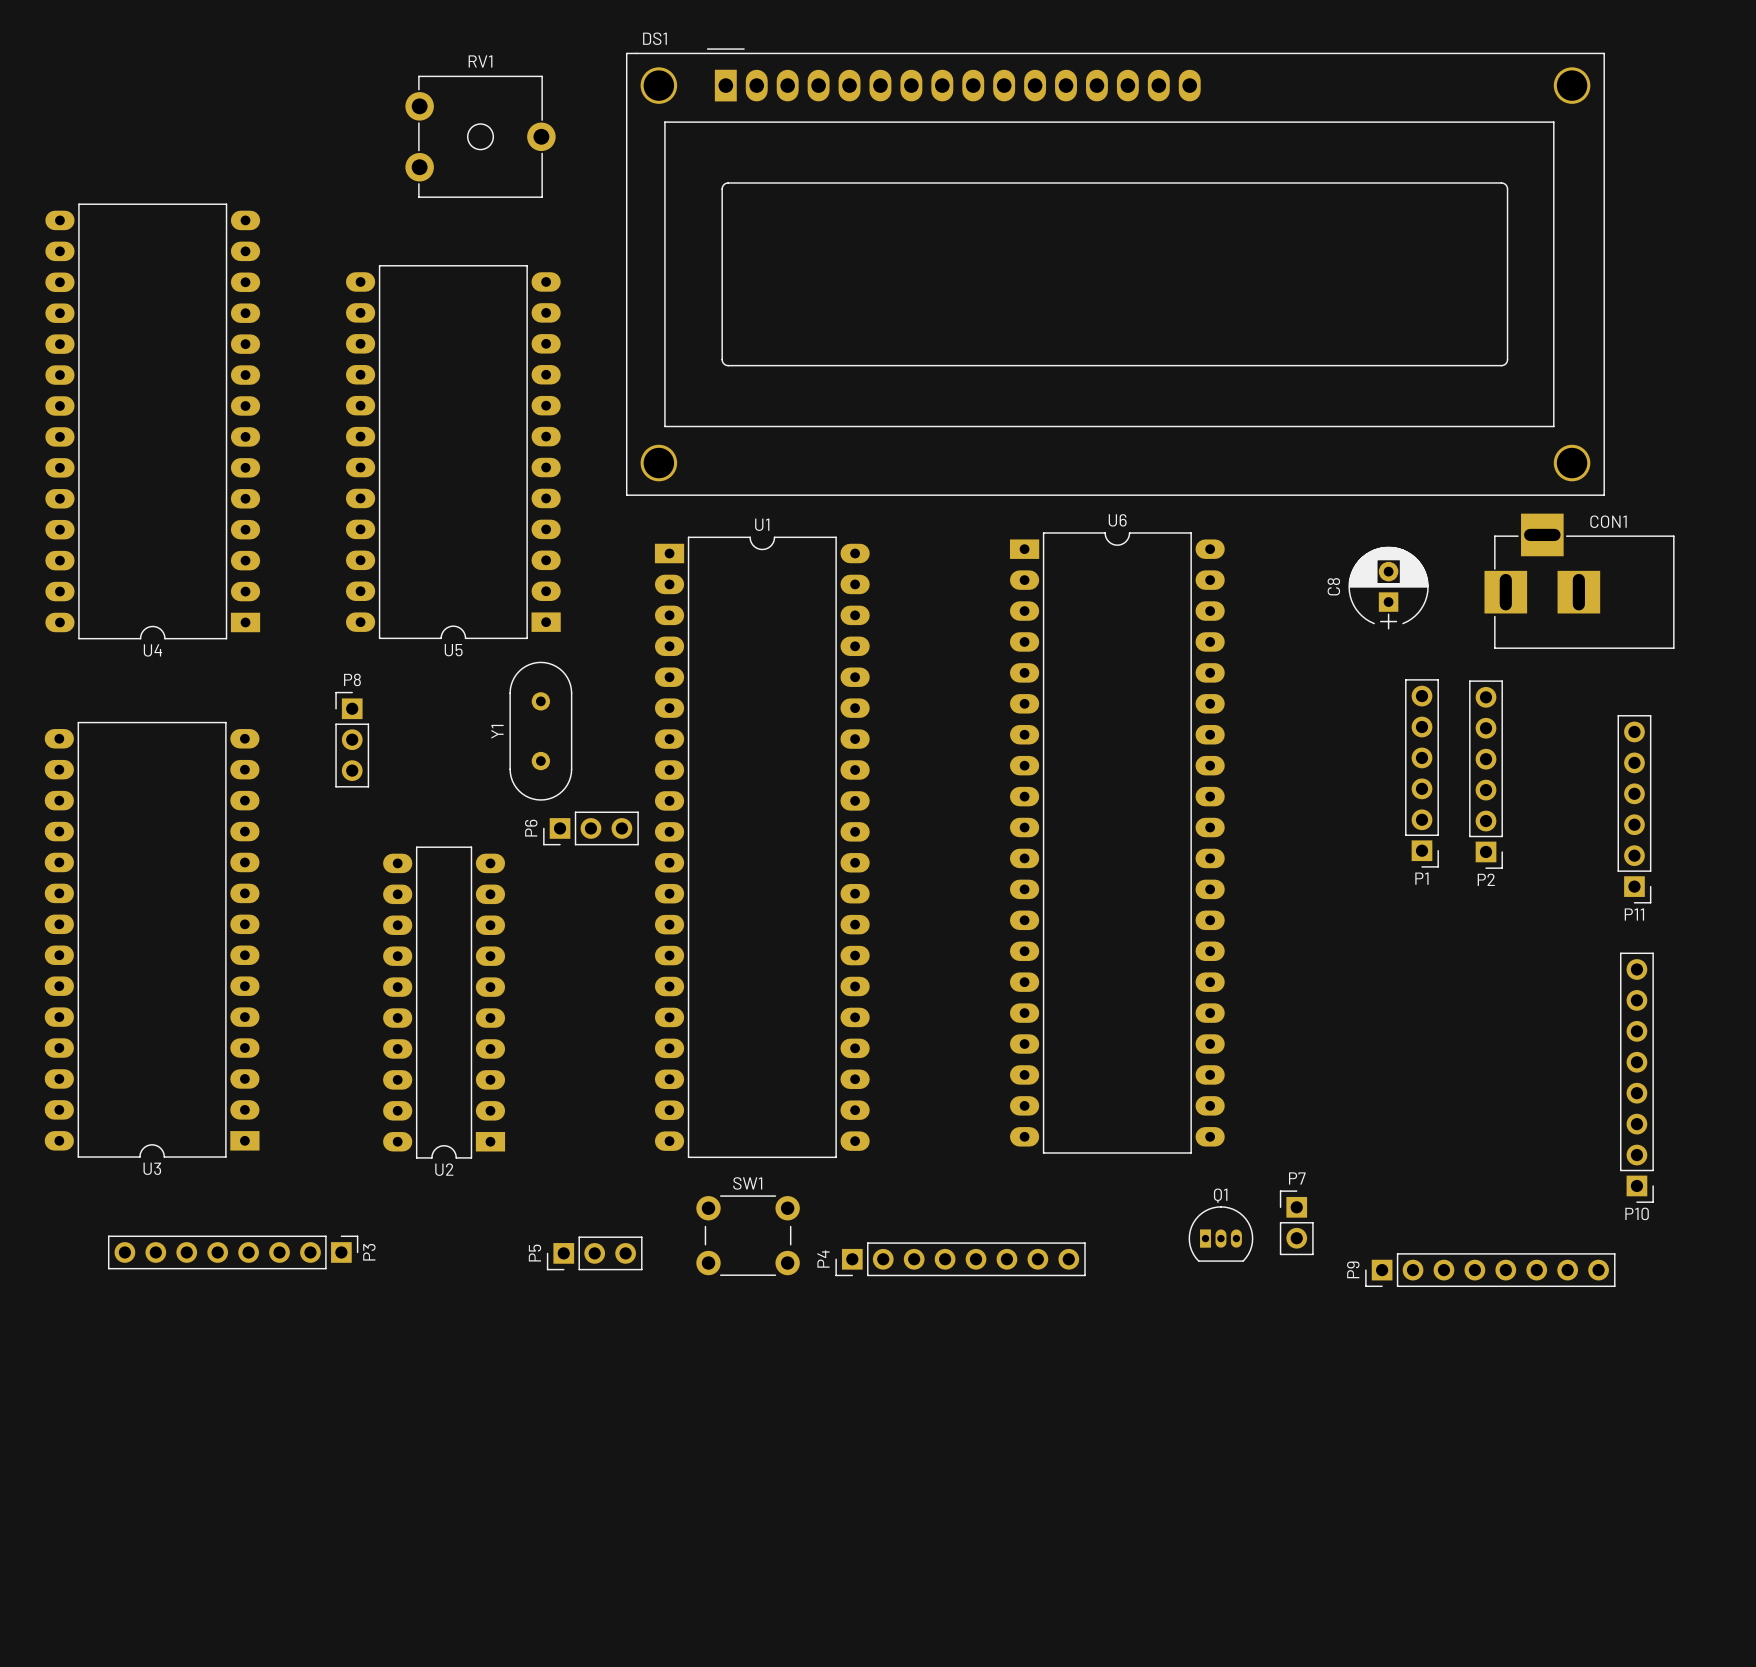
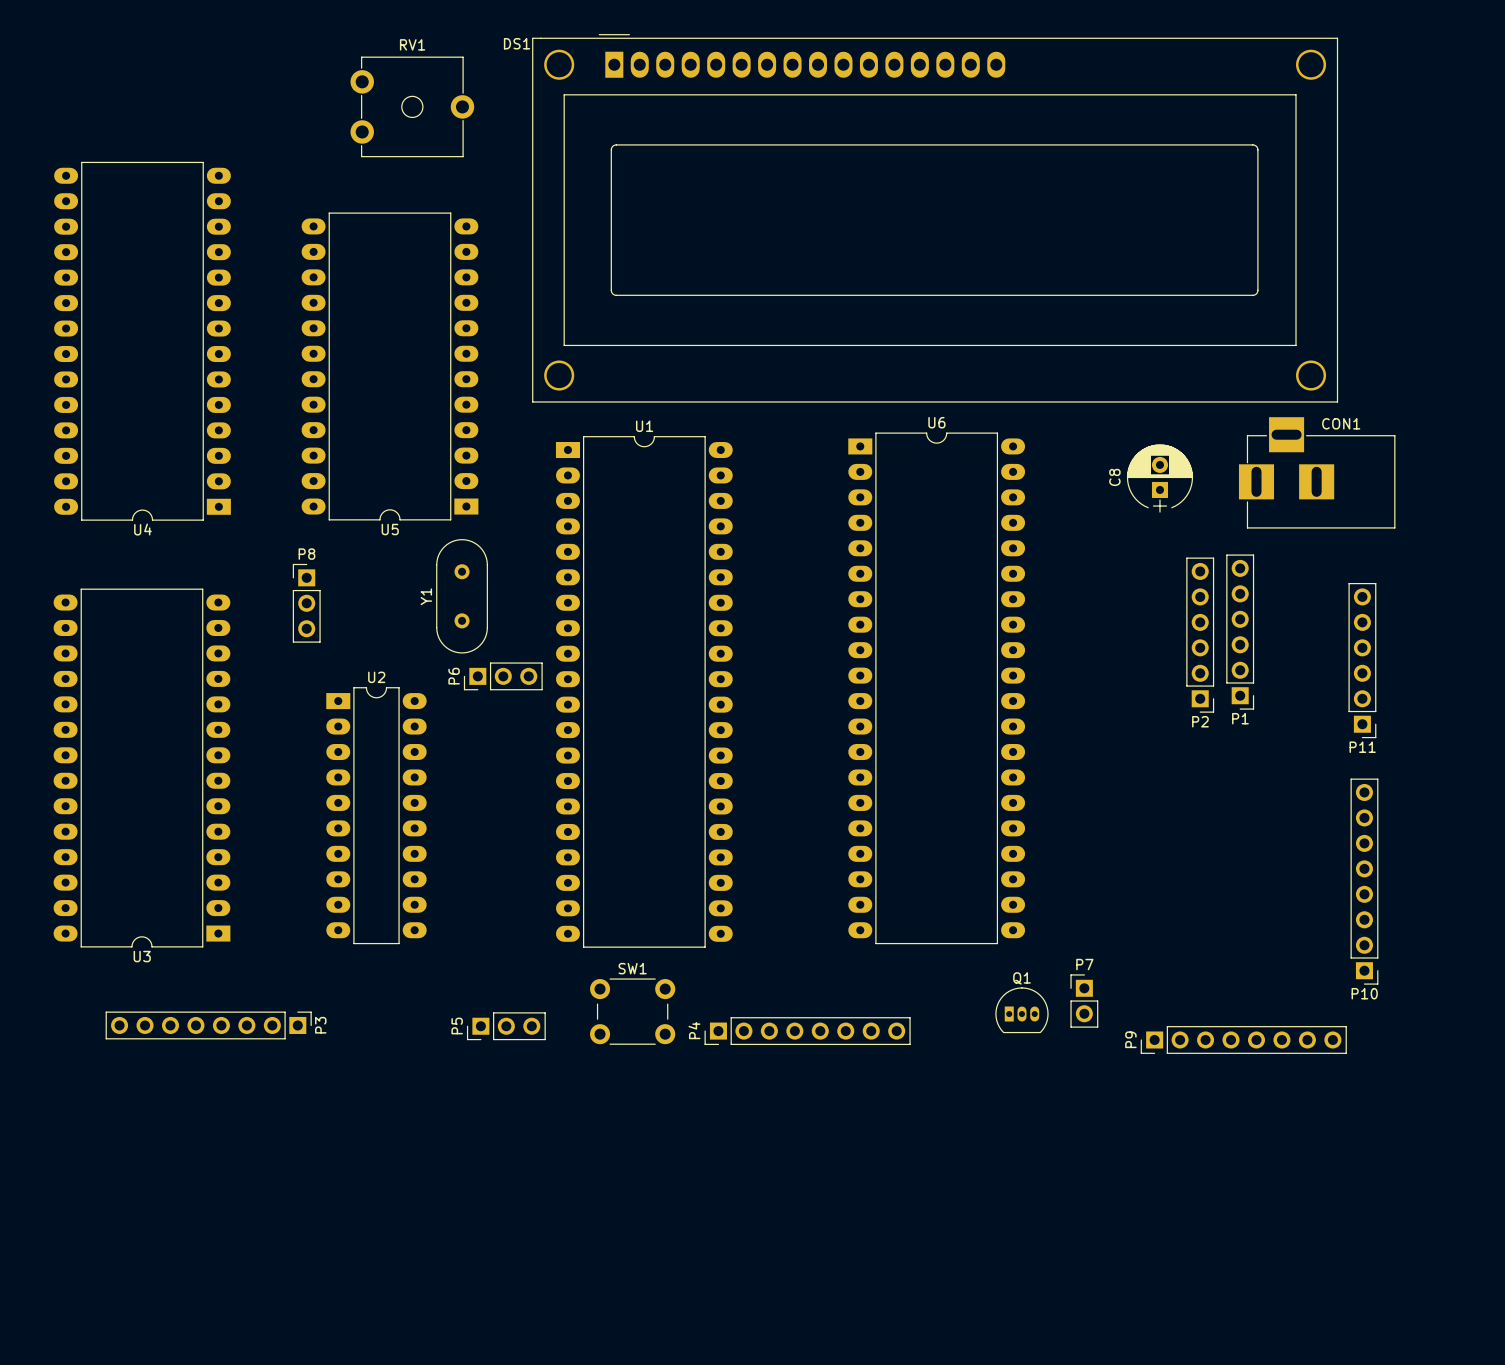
DS1 name position: DS1 (654, 38) -> DS1 (517, 43)
P1: (1421, 773) -> none
P2: none -> (1200, 635)
P2 name: P2 (1486, 879) -> P1 (1240, 718)
U2 rotation: 0° (444, 1002) -> 180° (376, 815)

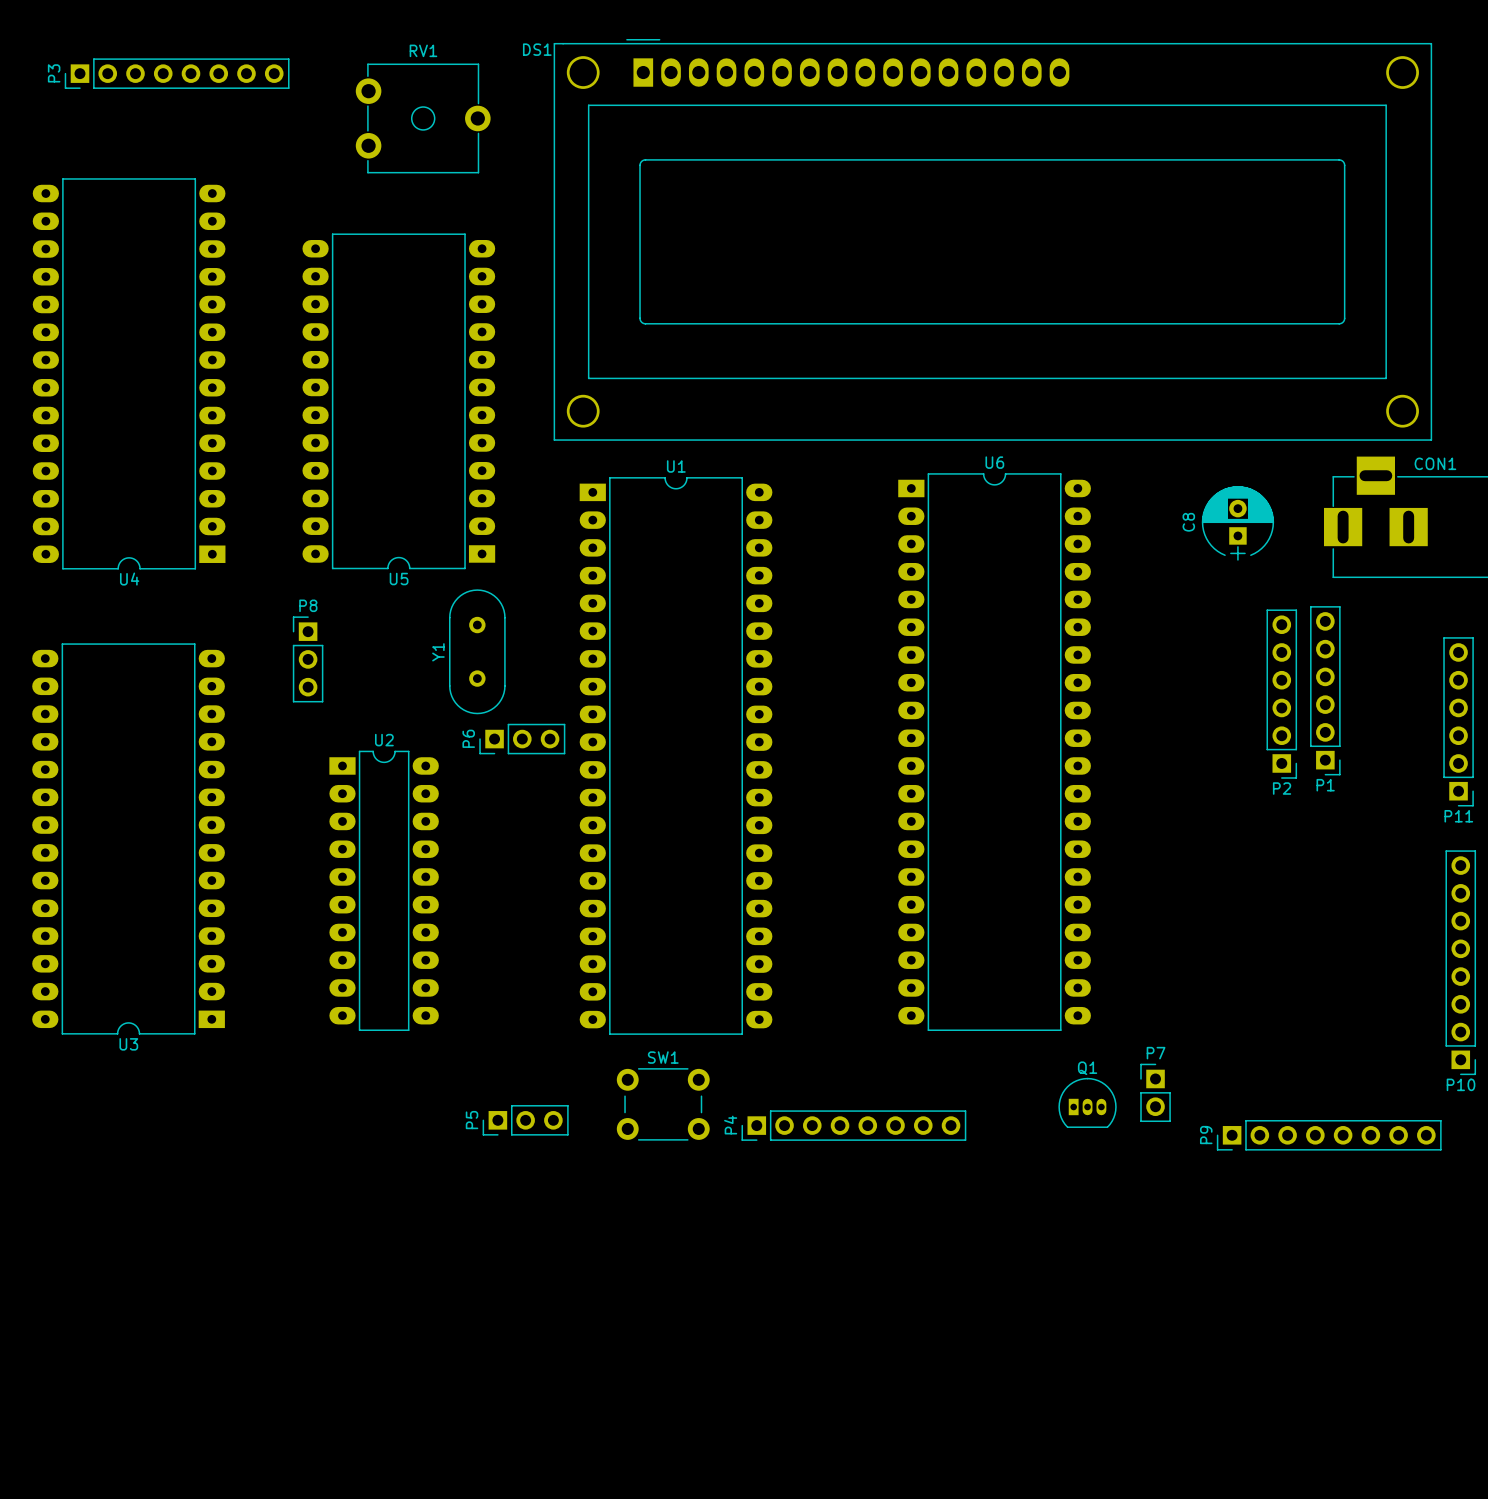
P3 rotation: 0° (208, 1025) -> 180° (177, 73)
P3 position: (208, 1025) -> (177, 73)

